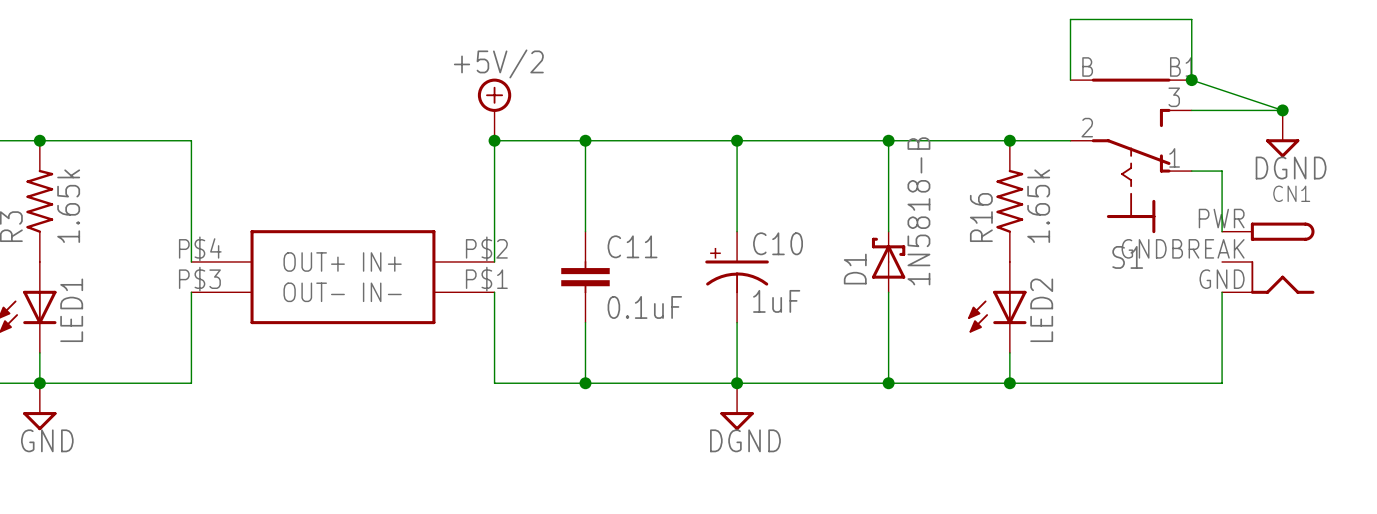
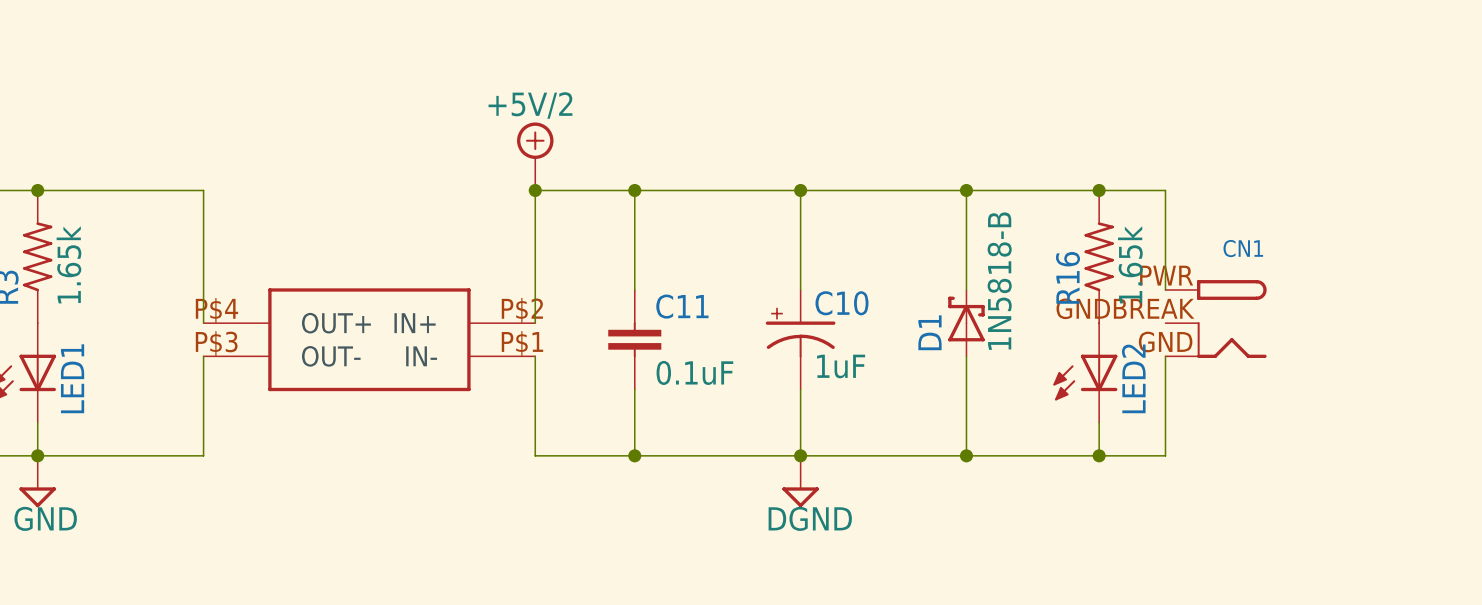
wire: (1070, 80) (1070, 19) (1191, 19) (1191, 80) (1282, 110) (1191, 110) -> none
junction: (1191, 80) -> none
junction: (1282, 110) -> none
power symbol: DGND (1282, 133) -> none
wire: none -> (1165, 190) (1165, 289)
S1: (1131, 155) -> none
wire: (1191, 171) (1222, 171) (1222, 231) -> none
CN1 position: (1268, 258) -> (1216, 319)
wire: (1222, 292) (1222, 383) (1070, 383) -> (1165, 356) (1165, 455)

